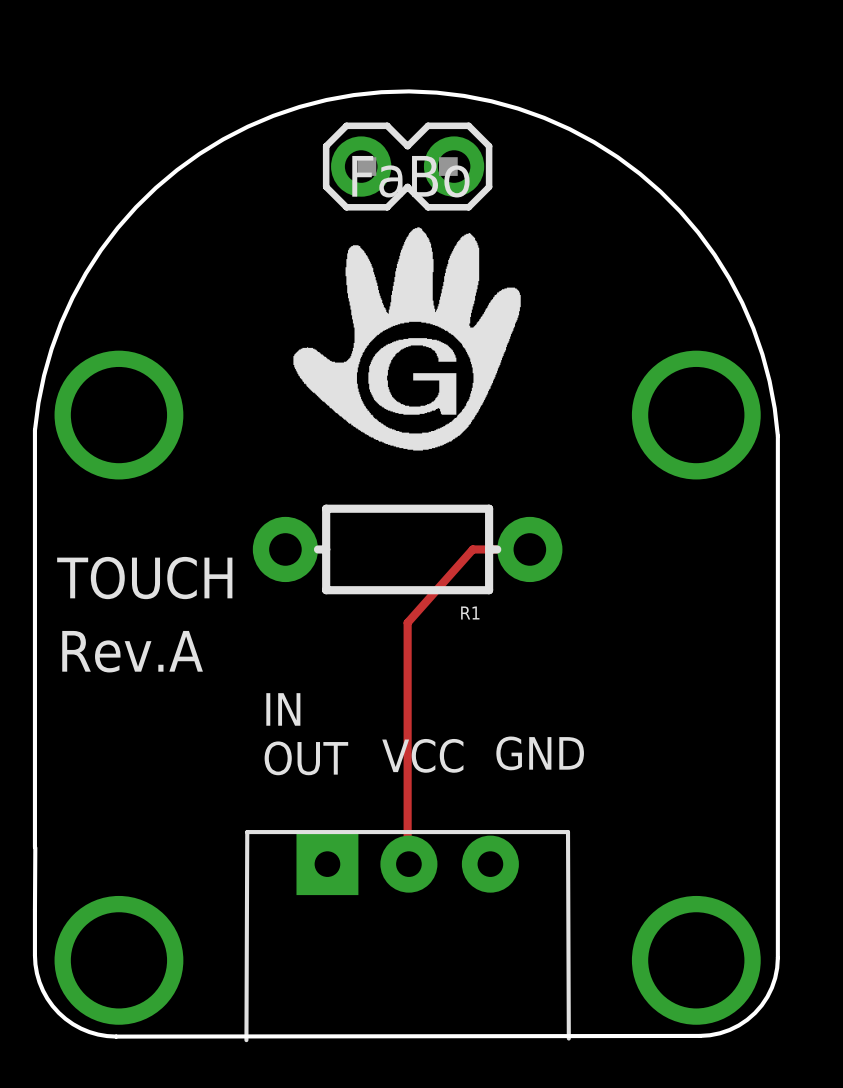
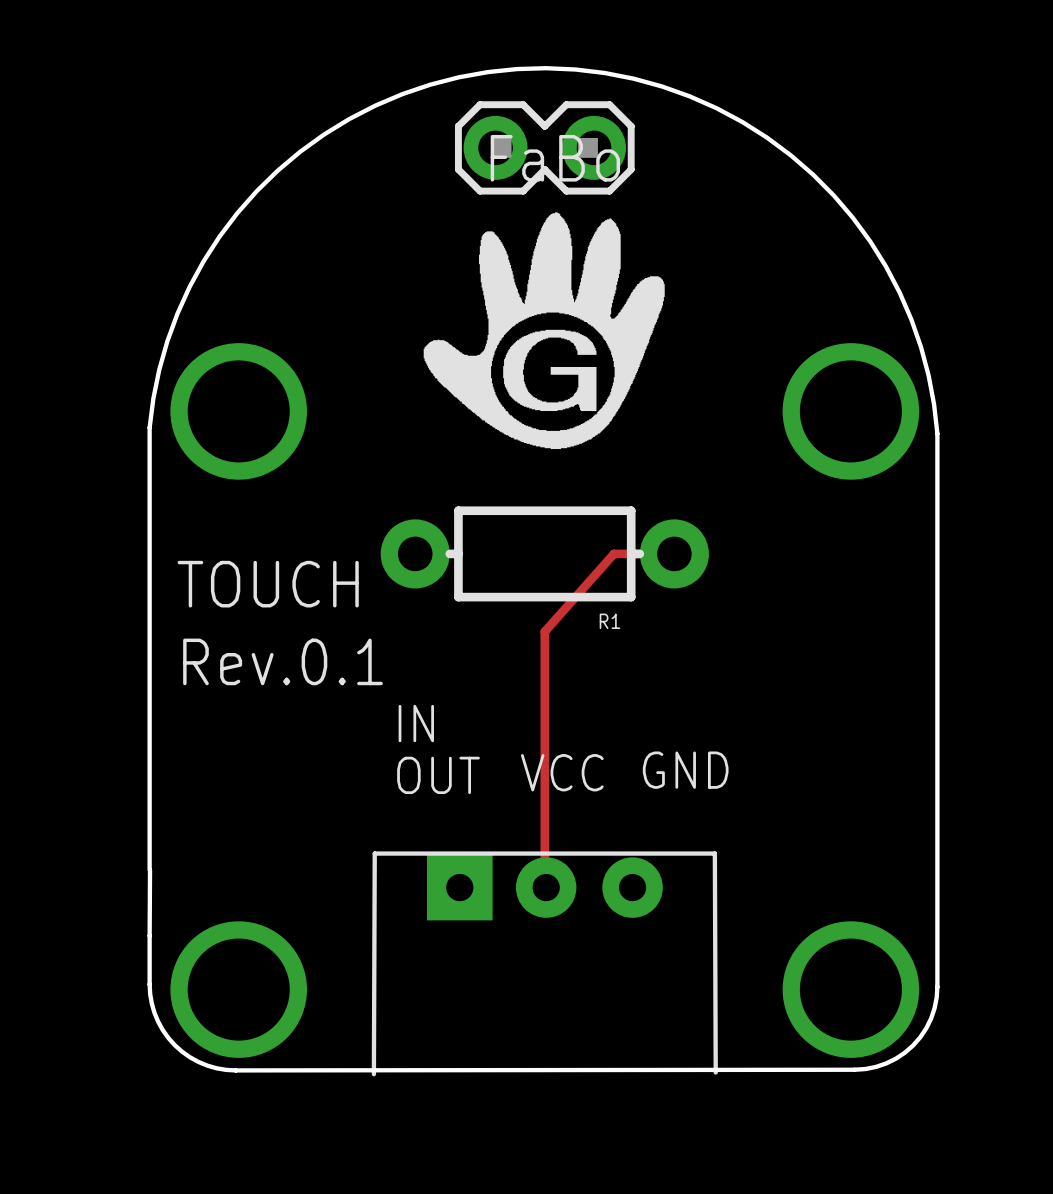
text: Rev.A (132, 651) -> Rev.0.1 (282, 661)

